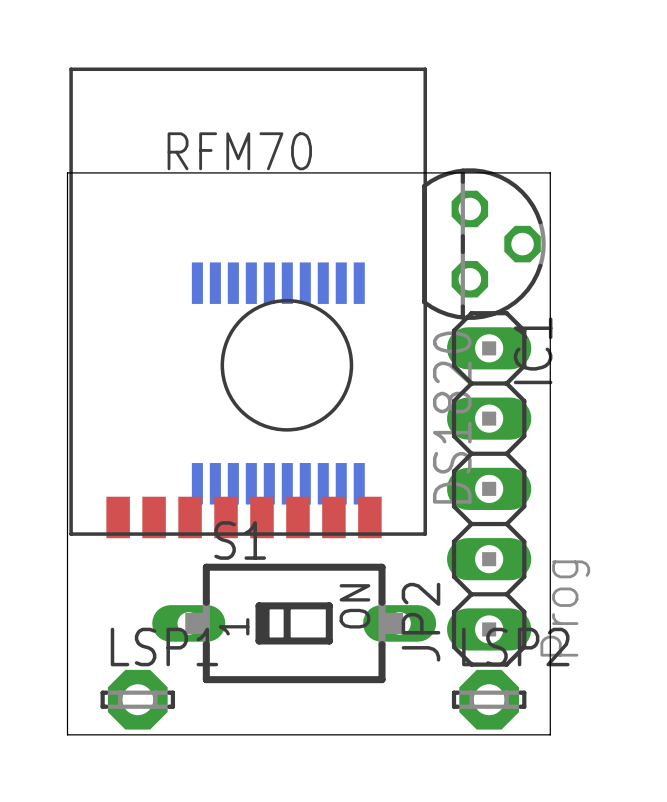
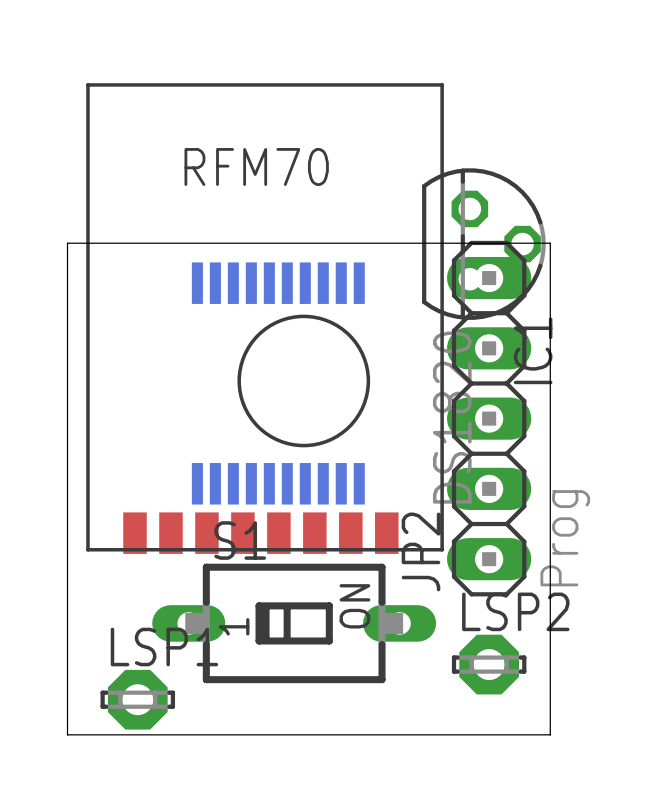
board edge: (67, 243) (67, 172) (550, 172) (550, 243) -> (67, 243) (550, 243)
part position: (248, 302) -> (265, 318)
JP2 position: (489, 488) -> (489, 418)
LSP2 position: (489, 699) -> (489, 664)

